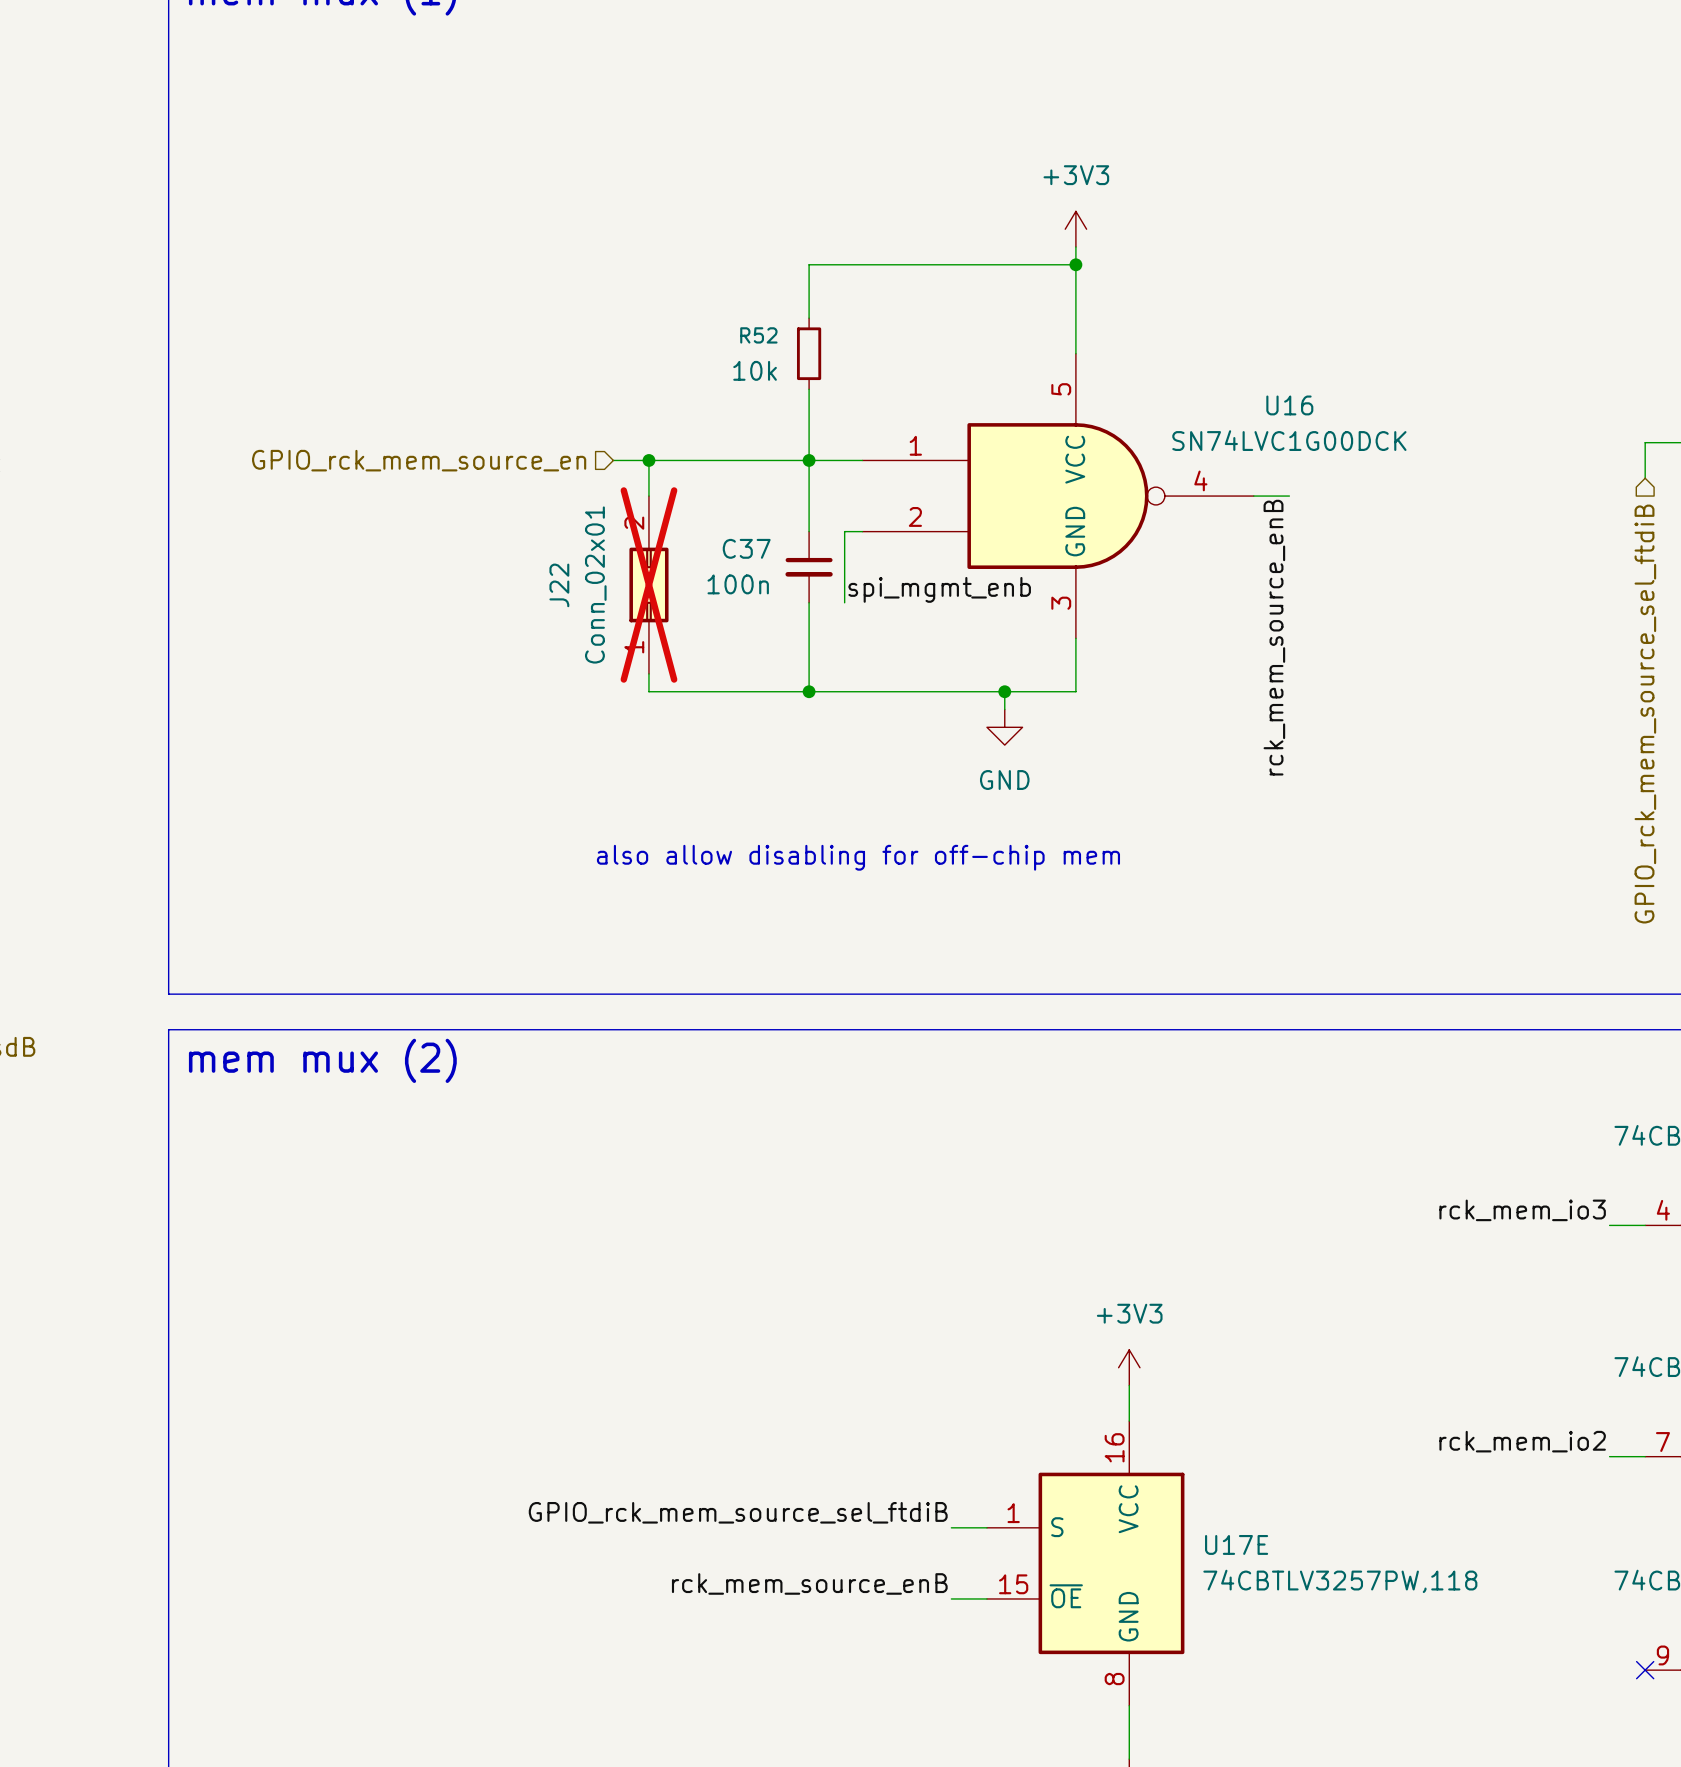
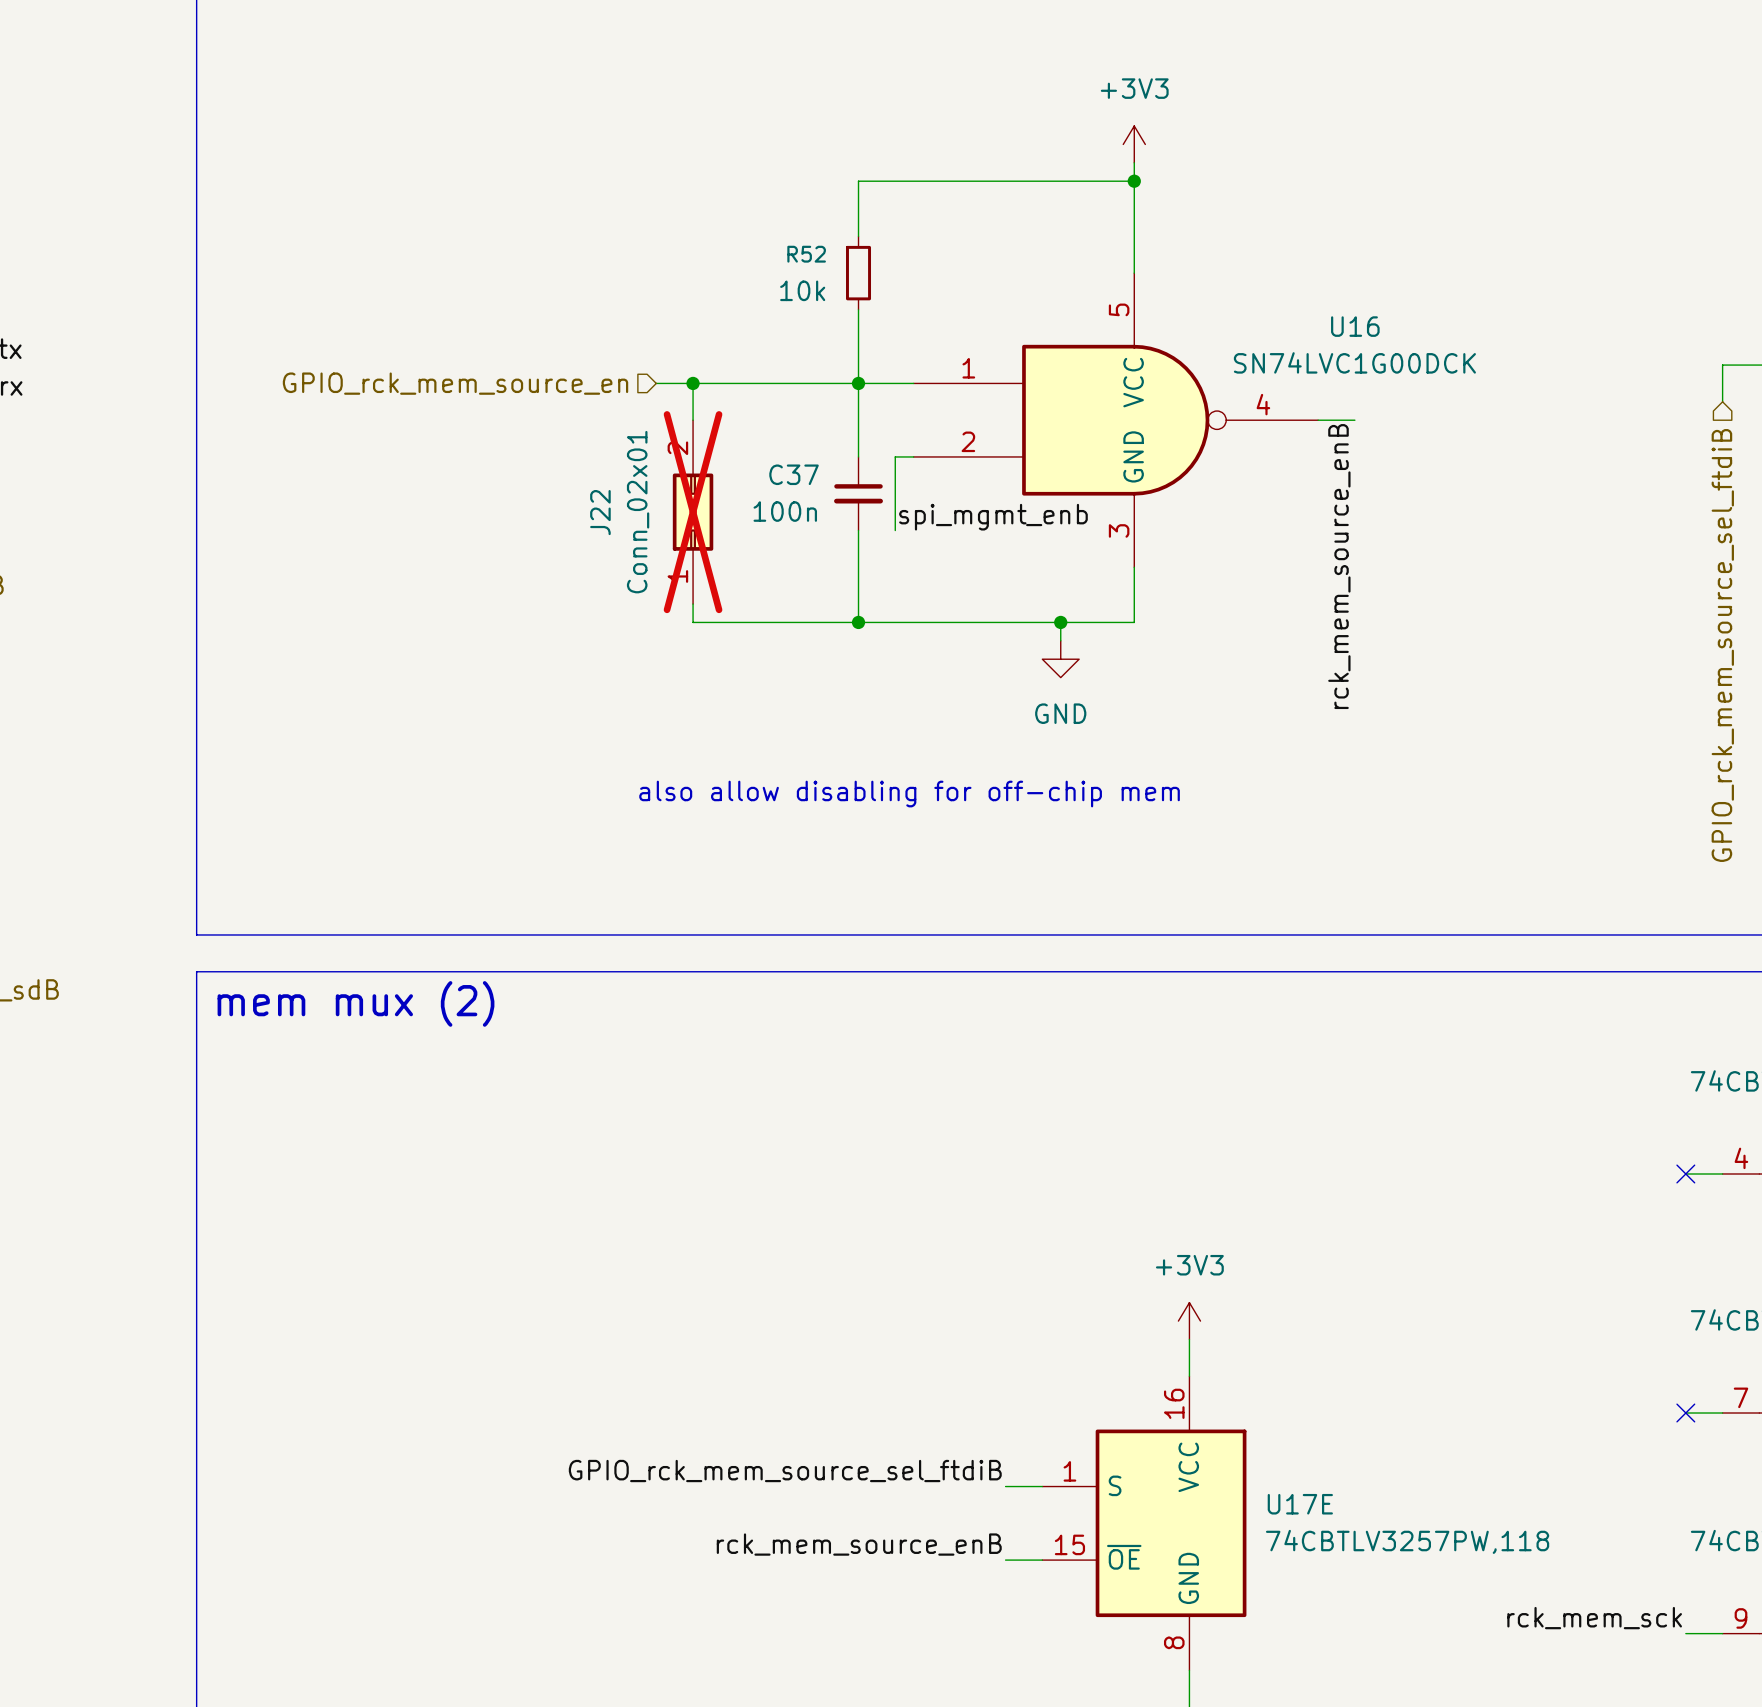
label: rck_mem_io3 (1522, 1210) -> none
no-connect mark: none -> (1685, 1173)
label: rck_mem_io2 (1522, 1441) -> none
no-connect mark: none -> (1685, 1413)
label: none -> rck_mem_sck (1594, 1618)
wire: none -> (1685, 1633) (1722, 1633)
no-connect mark: (1645, 1670) -> none

